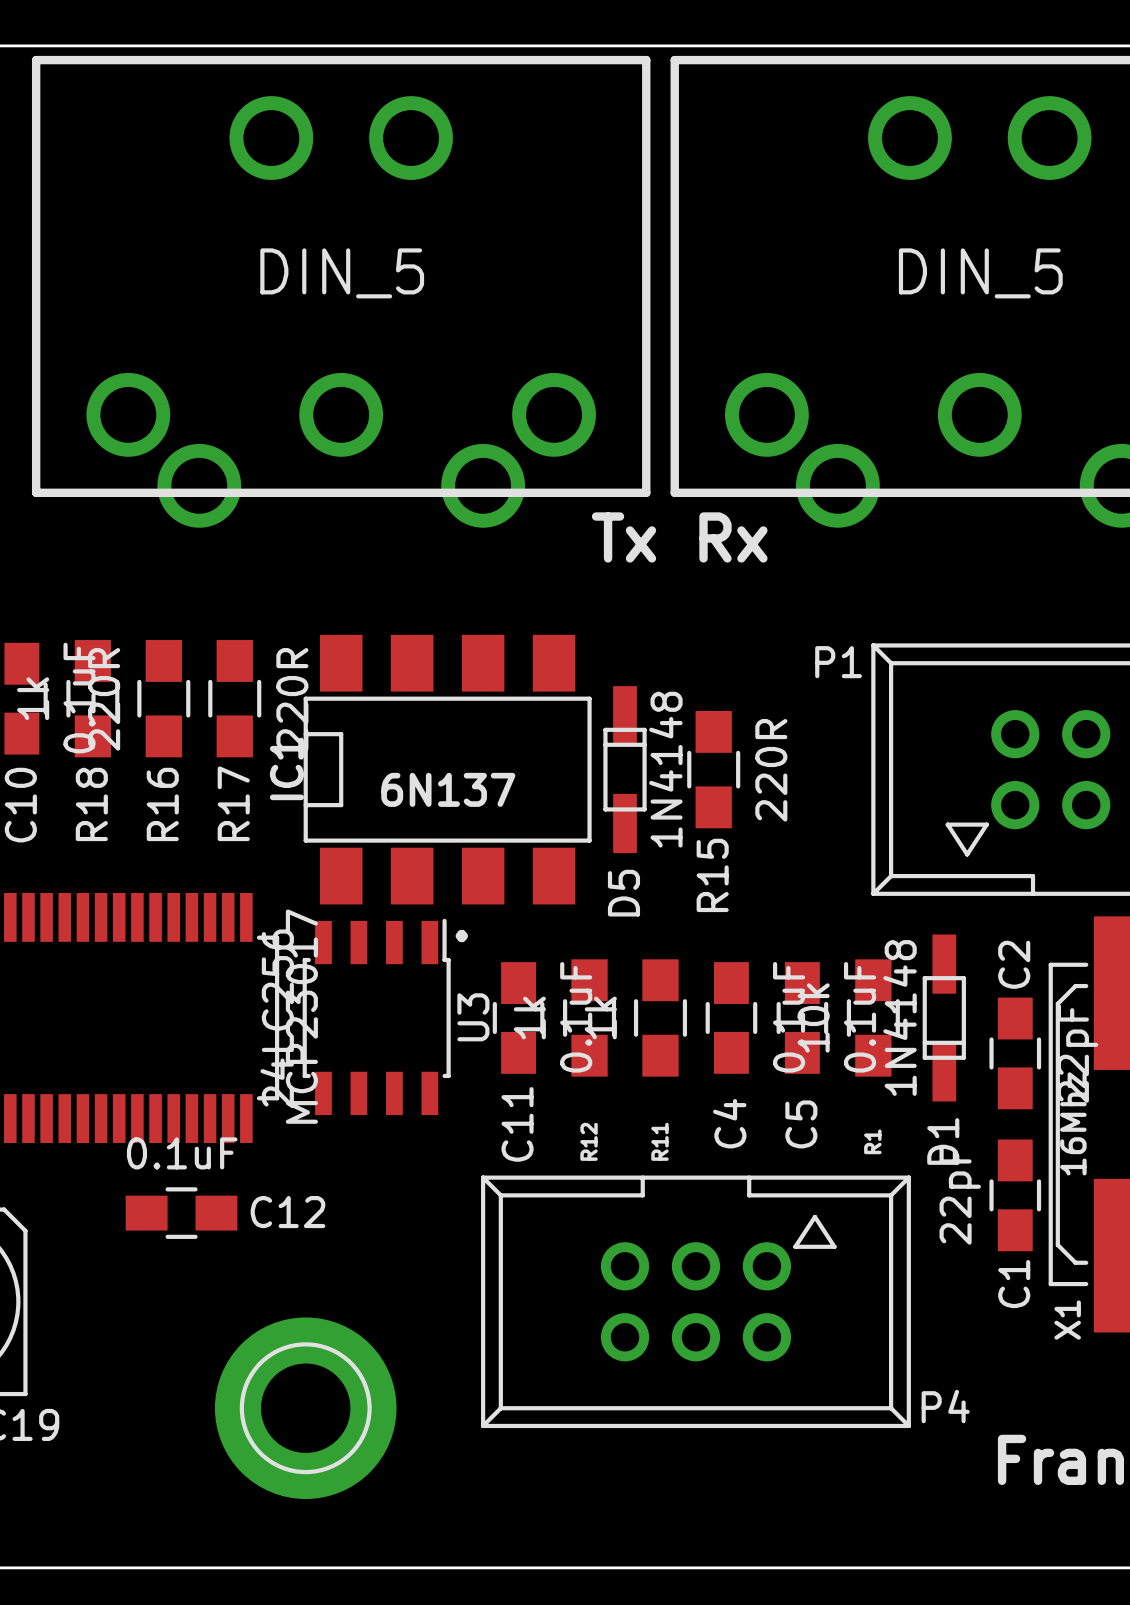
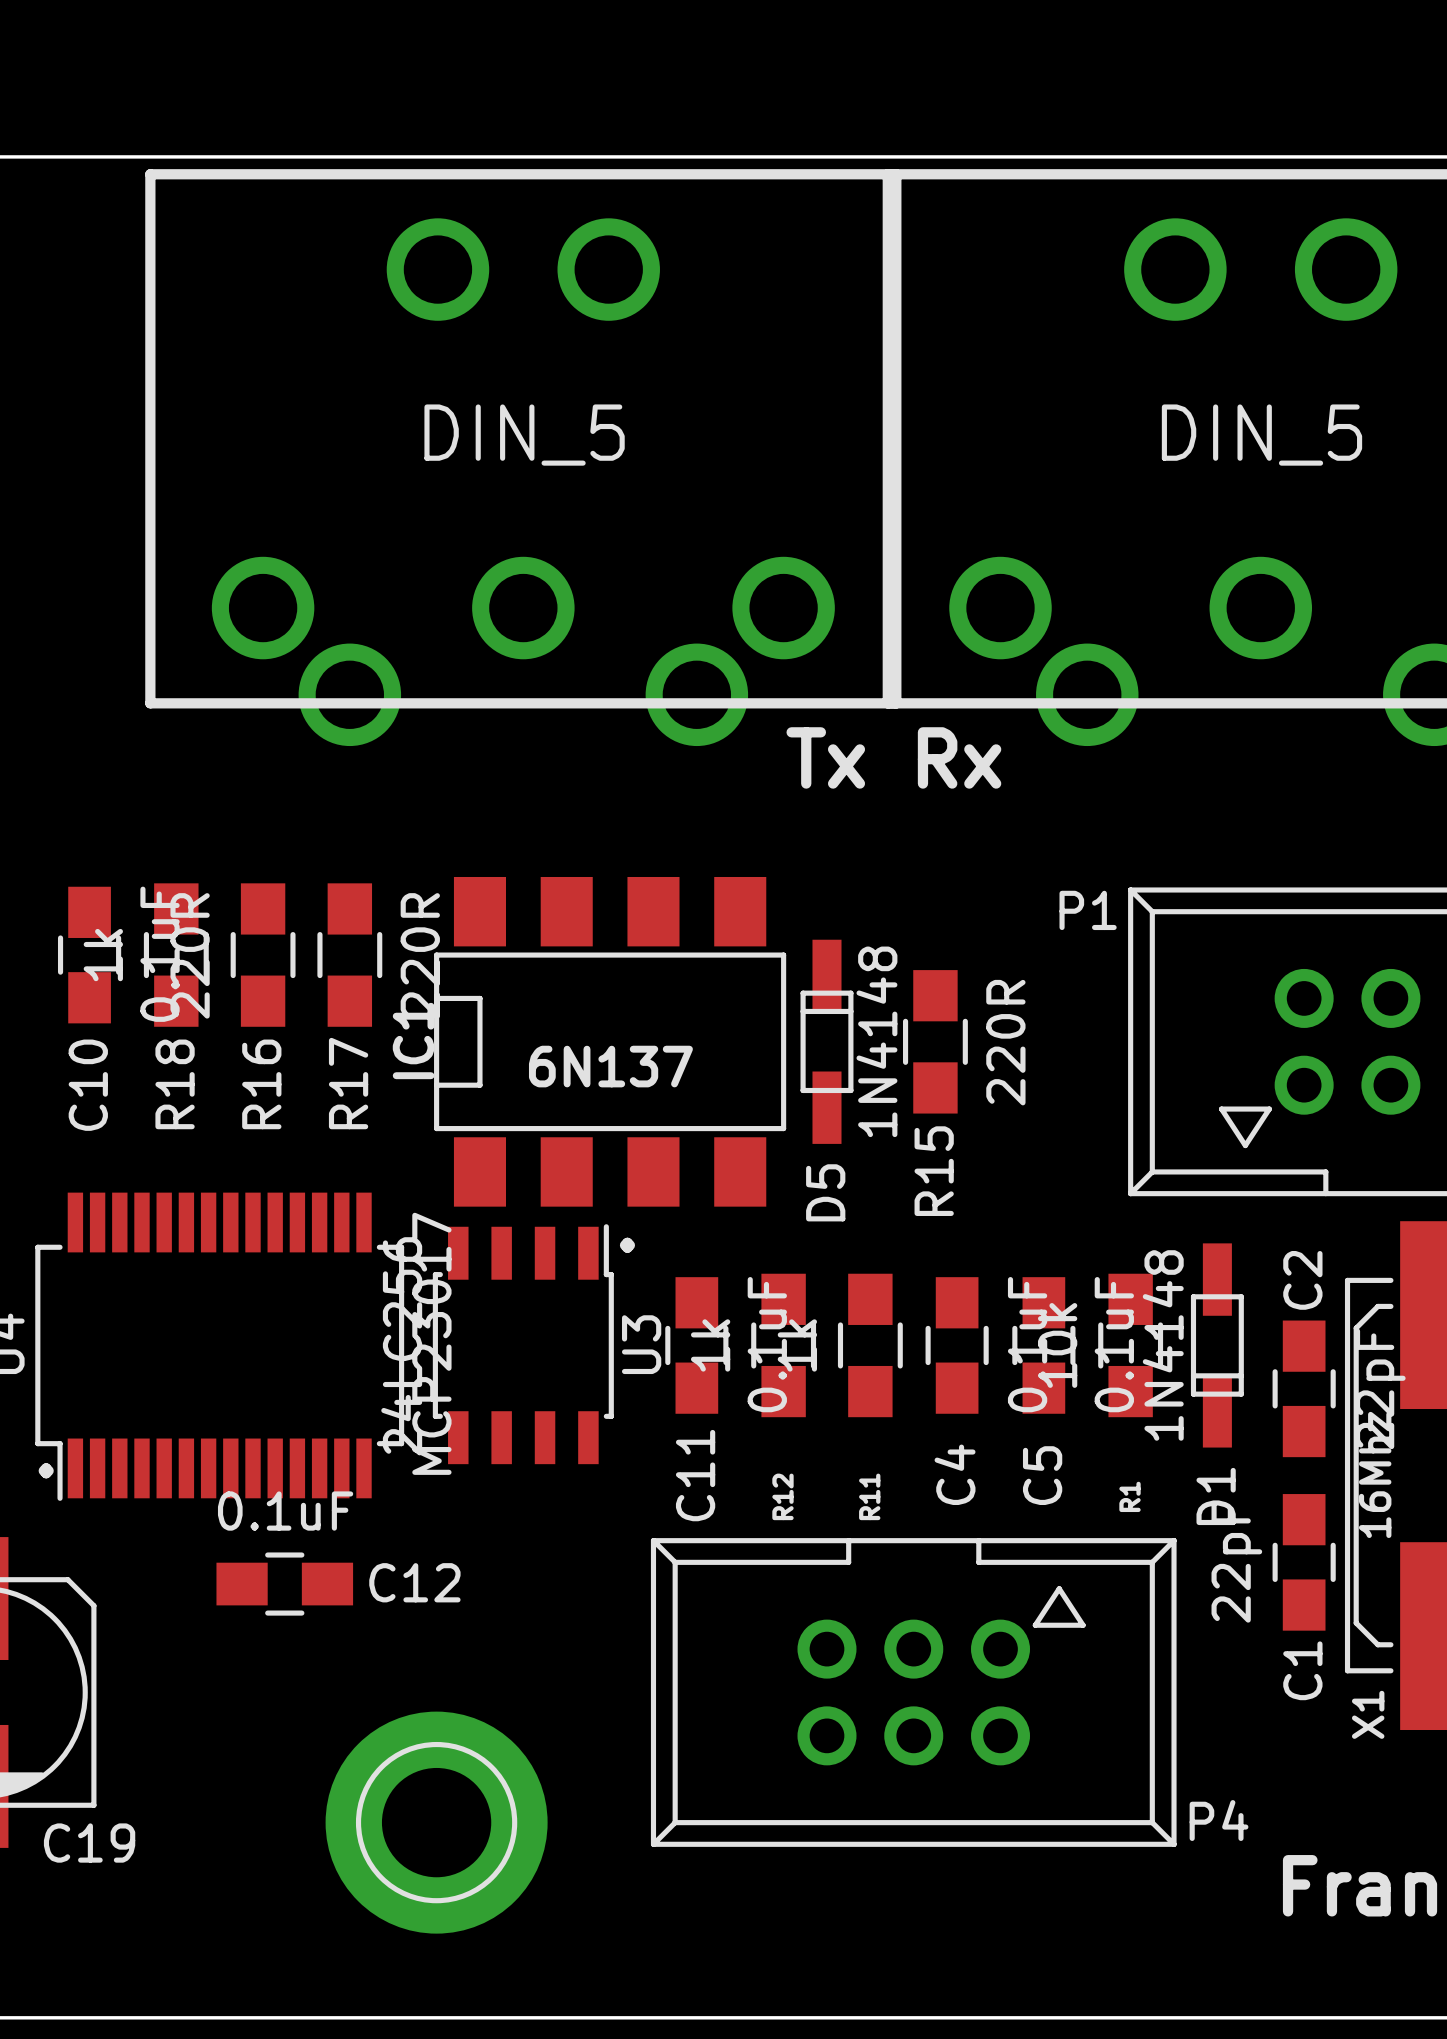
part position: (341, 291) -> (523, 457)

